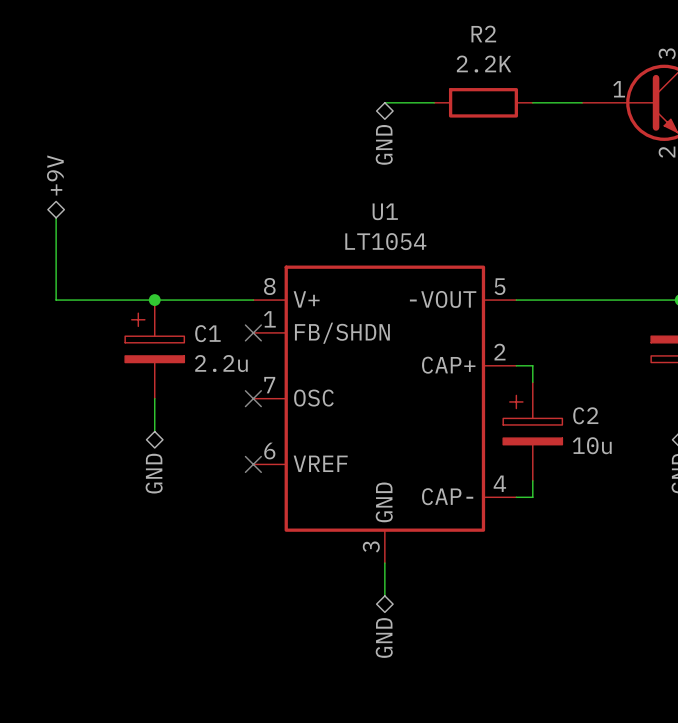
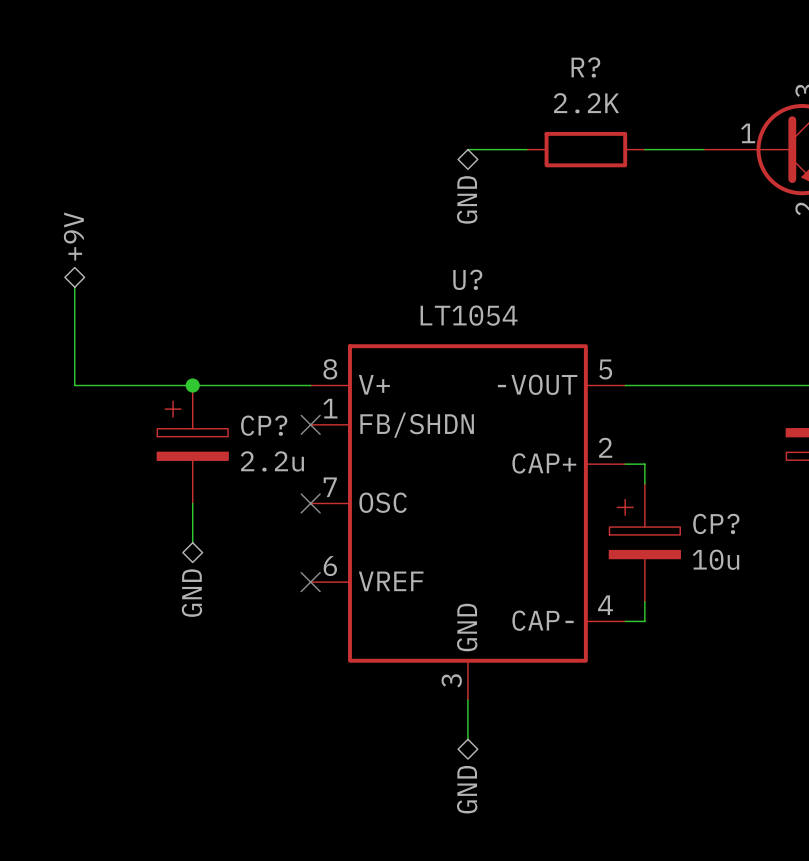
R2 name: R2 (483, 34) -> R? (585, 67)
U1 name: U1 (385, 211) -> U? (467, 279)
C1 name: C1 (207, 333) -> CP? (264, 425)
C2 name: C2 (585, 415) -> CP? (716, 523)

